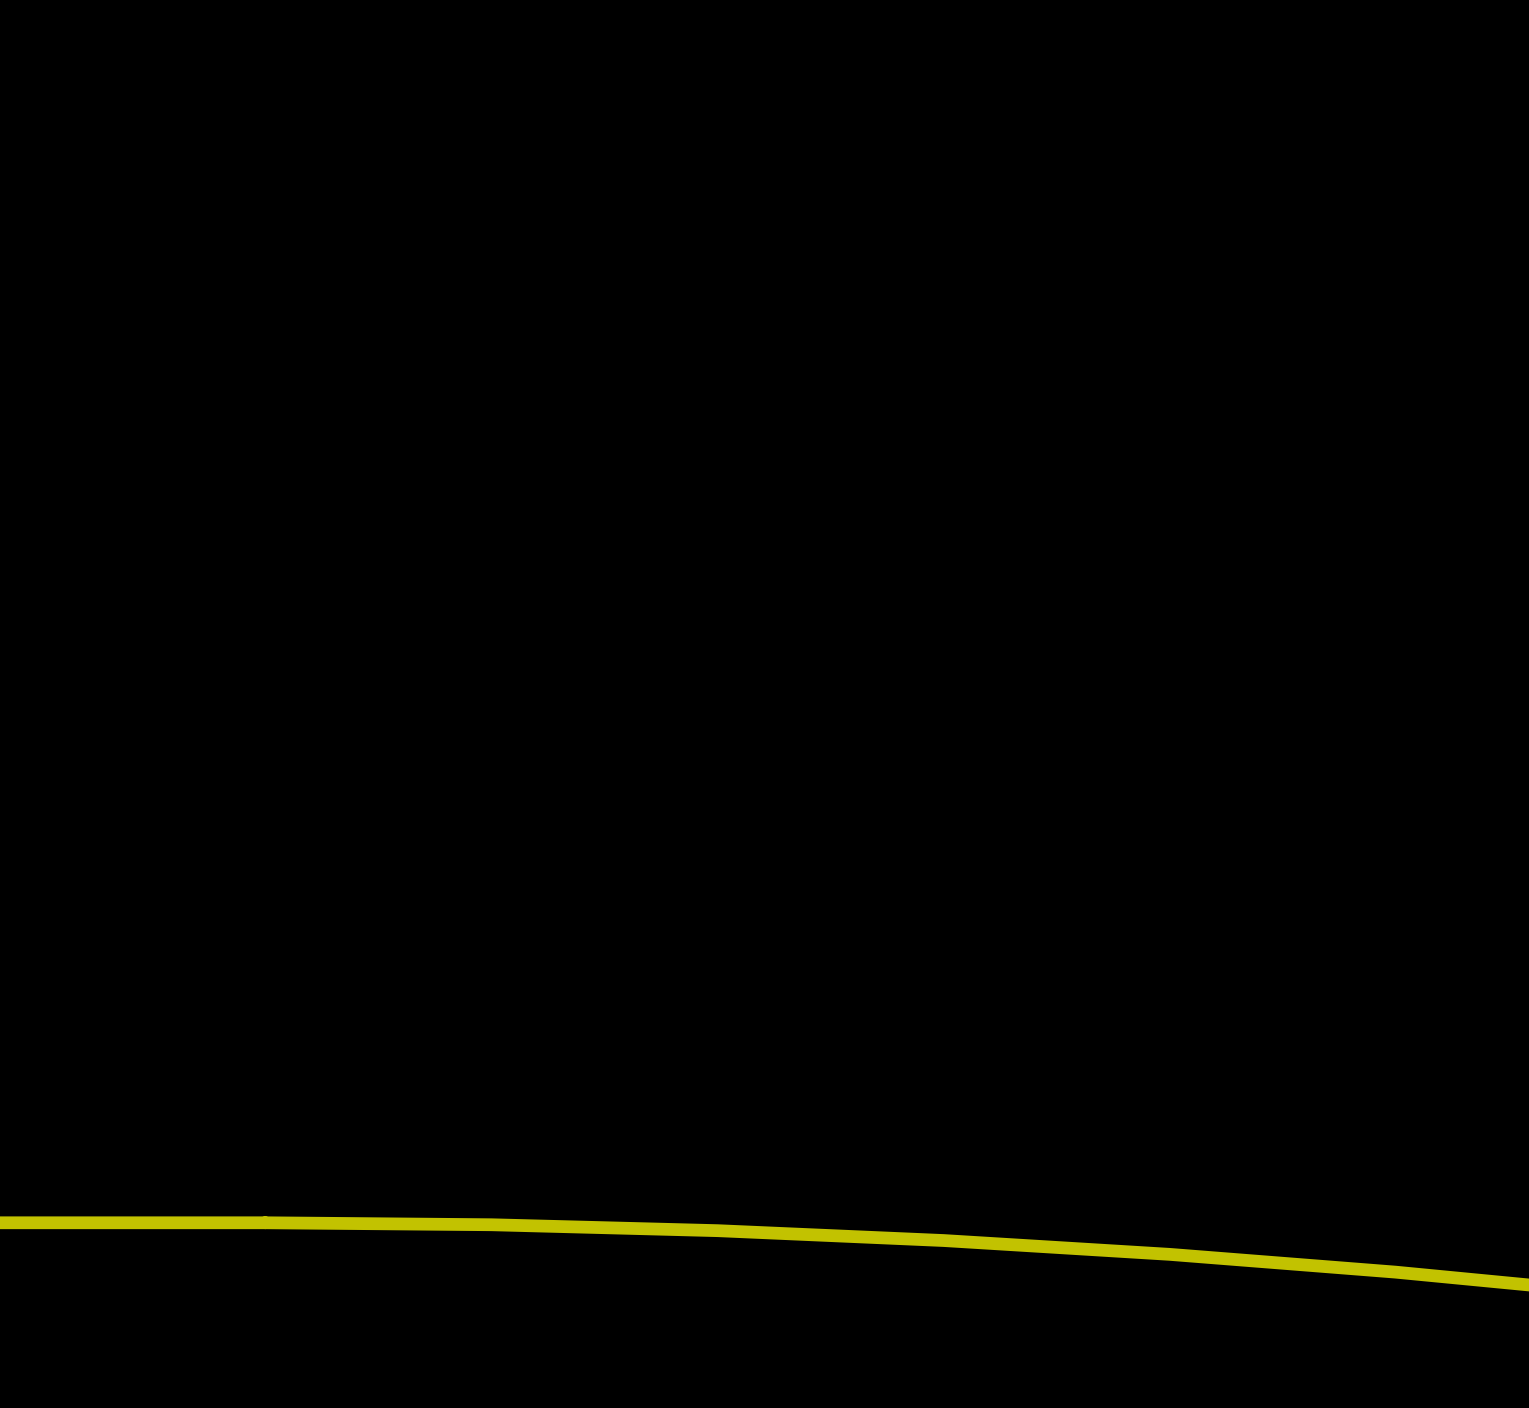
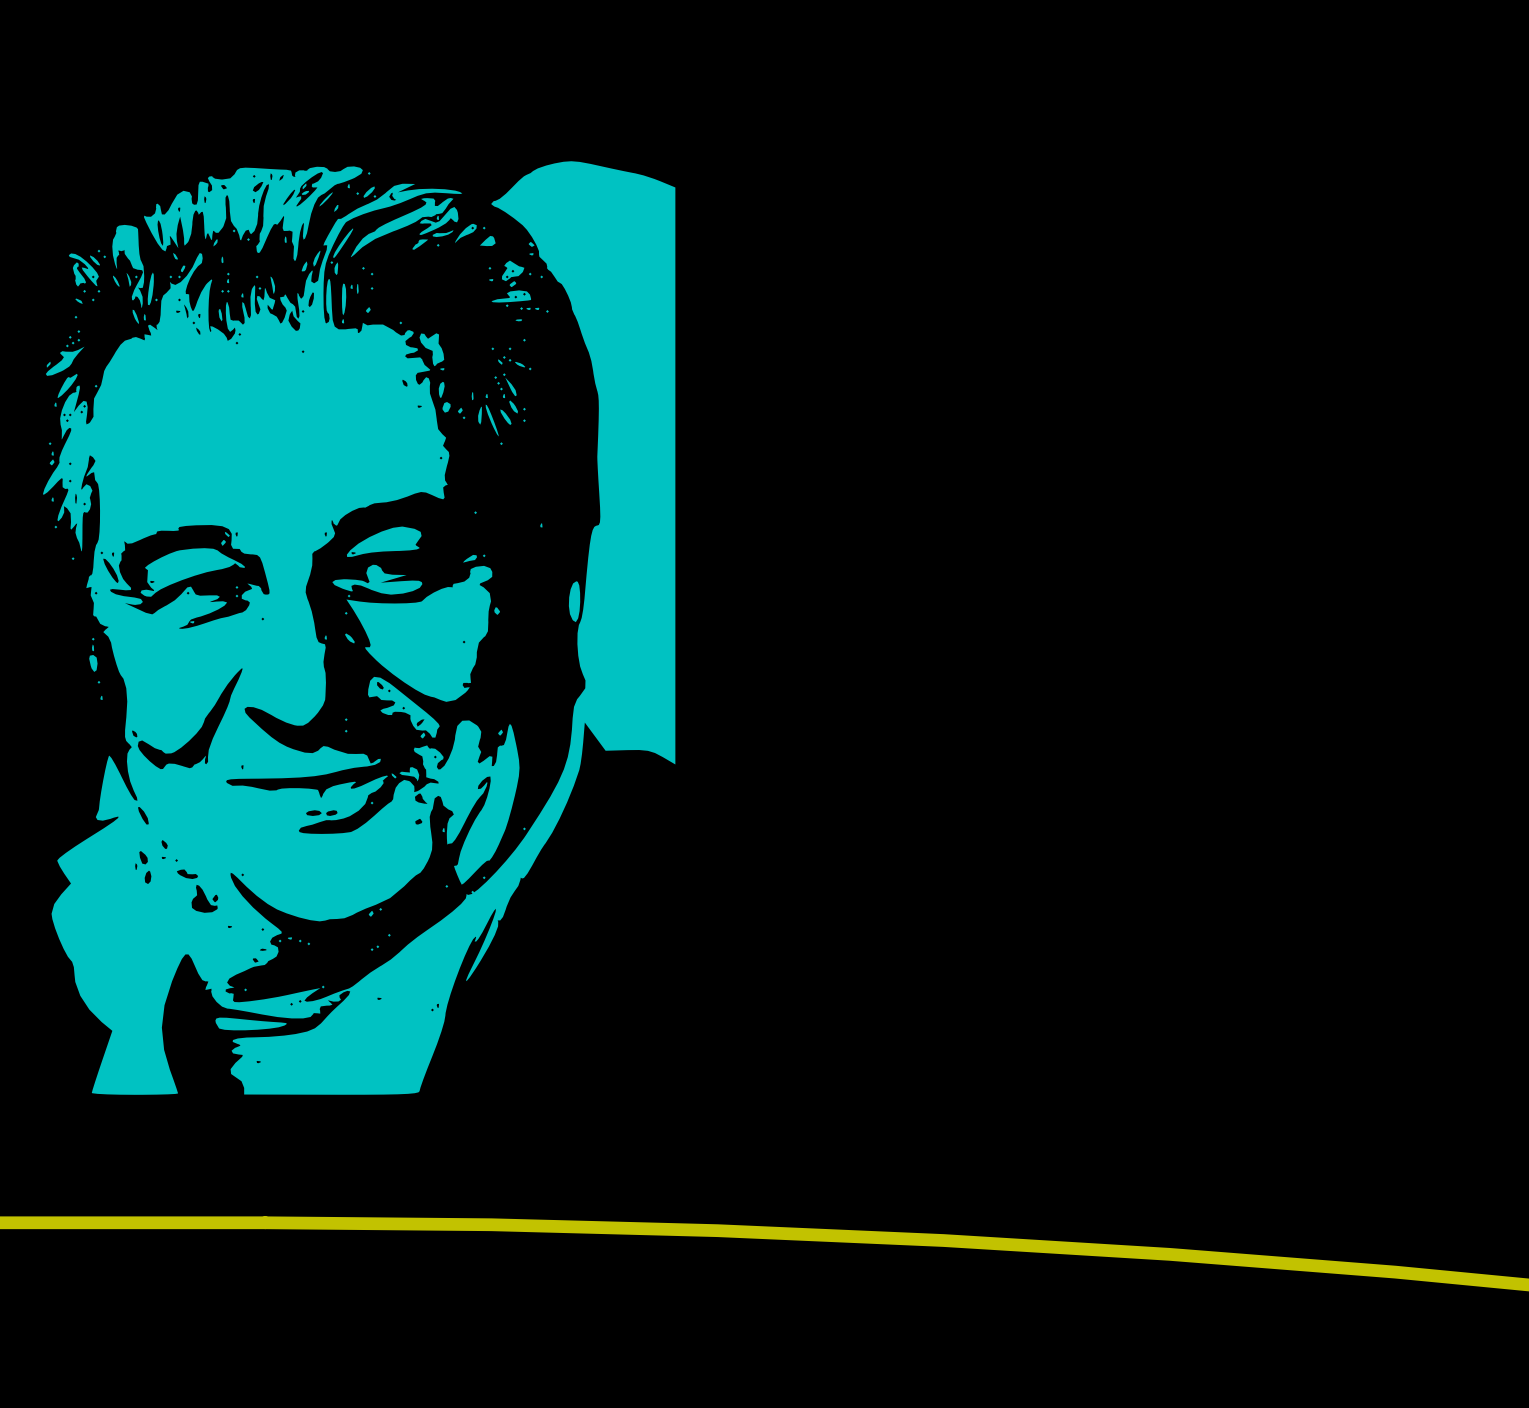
drawing: none -> [42, 161, 676, 1095]

